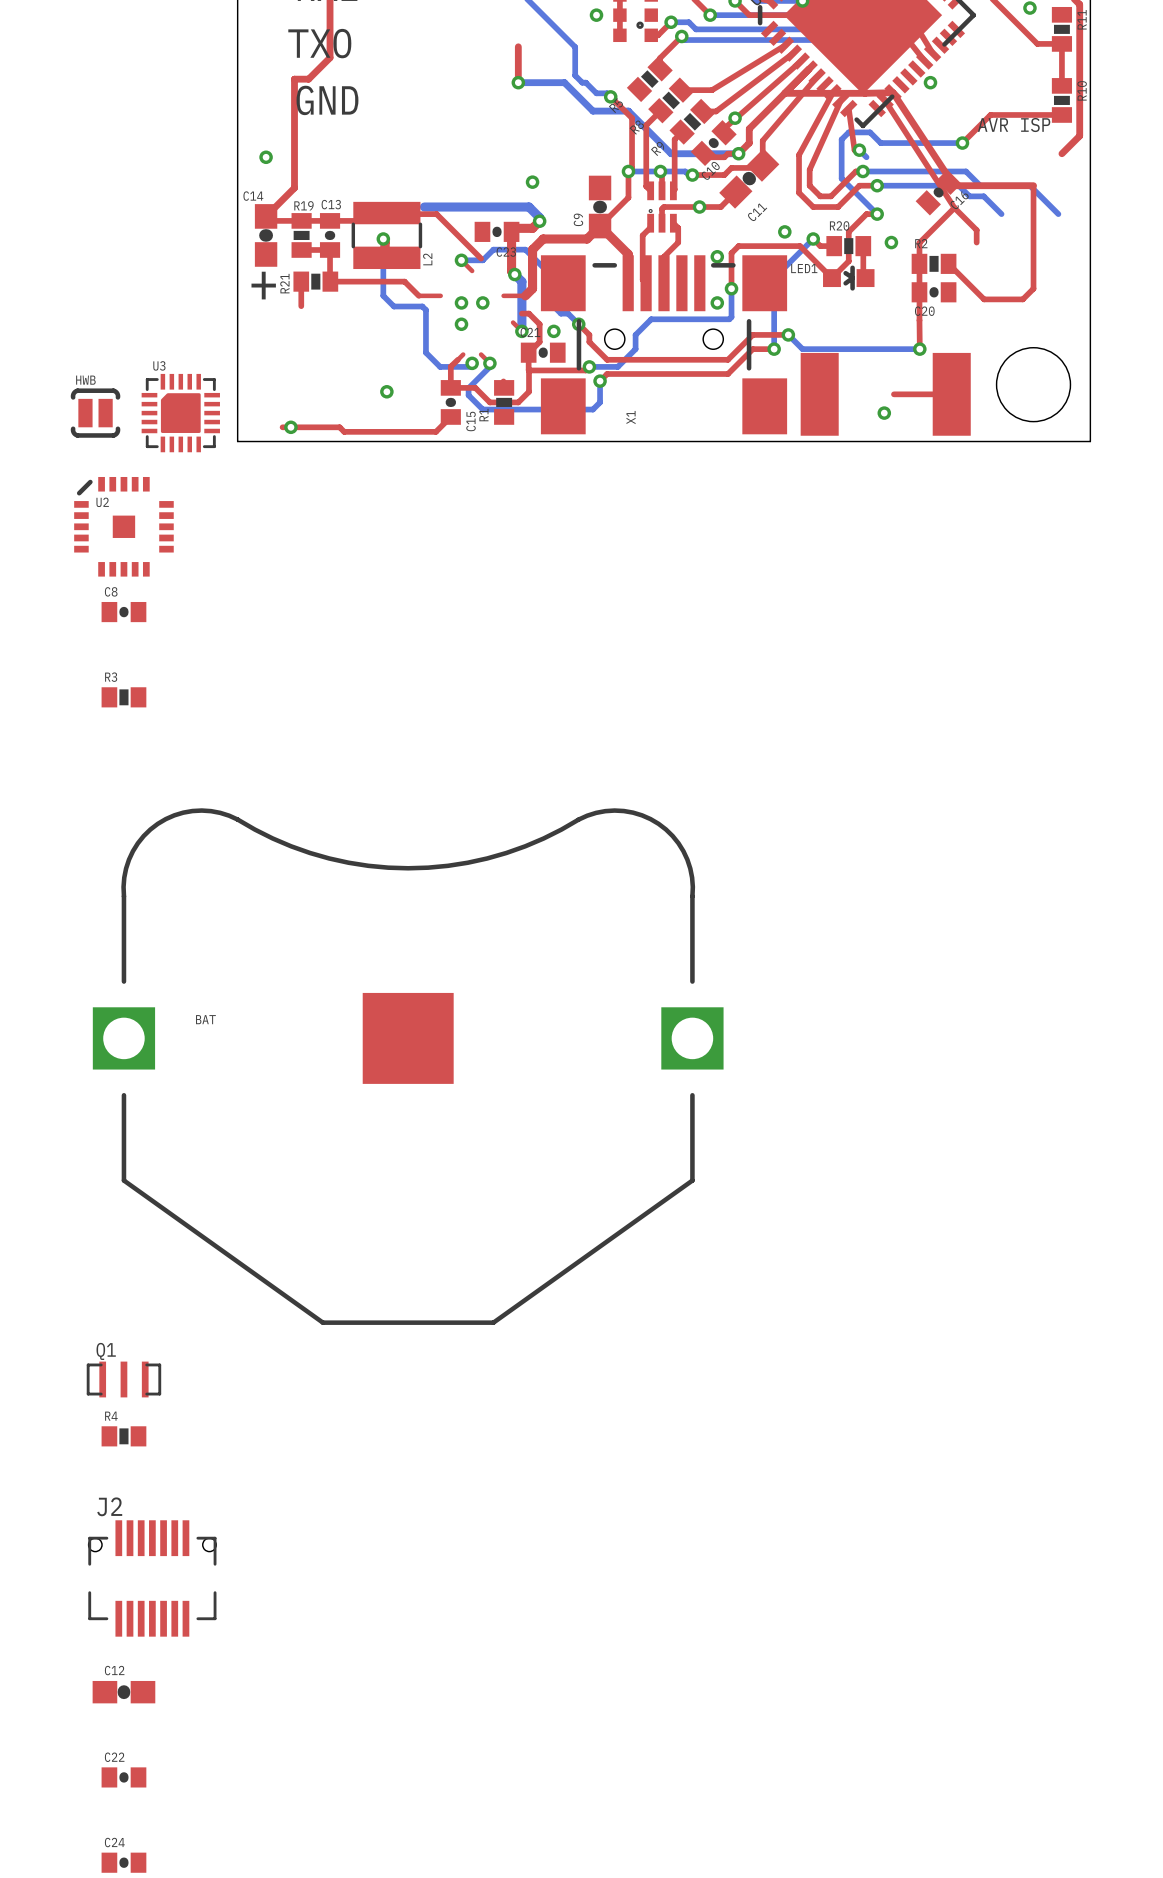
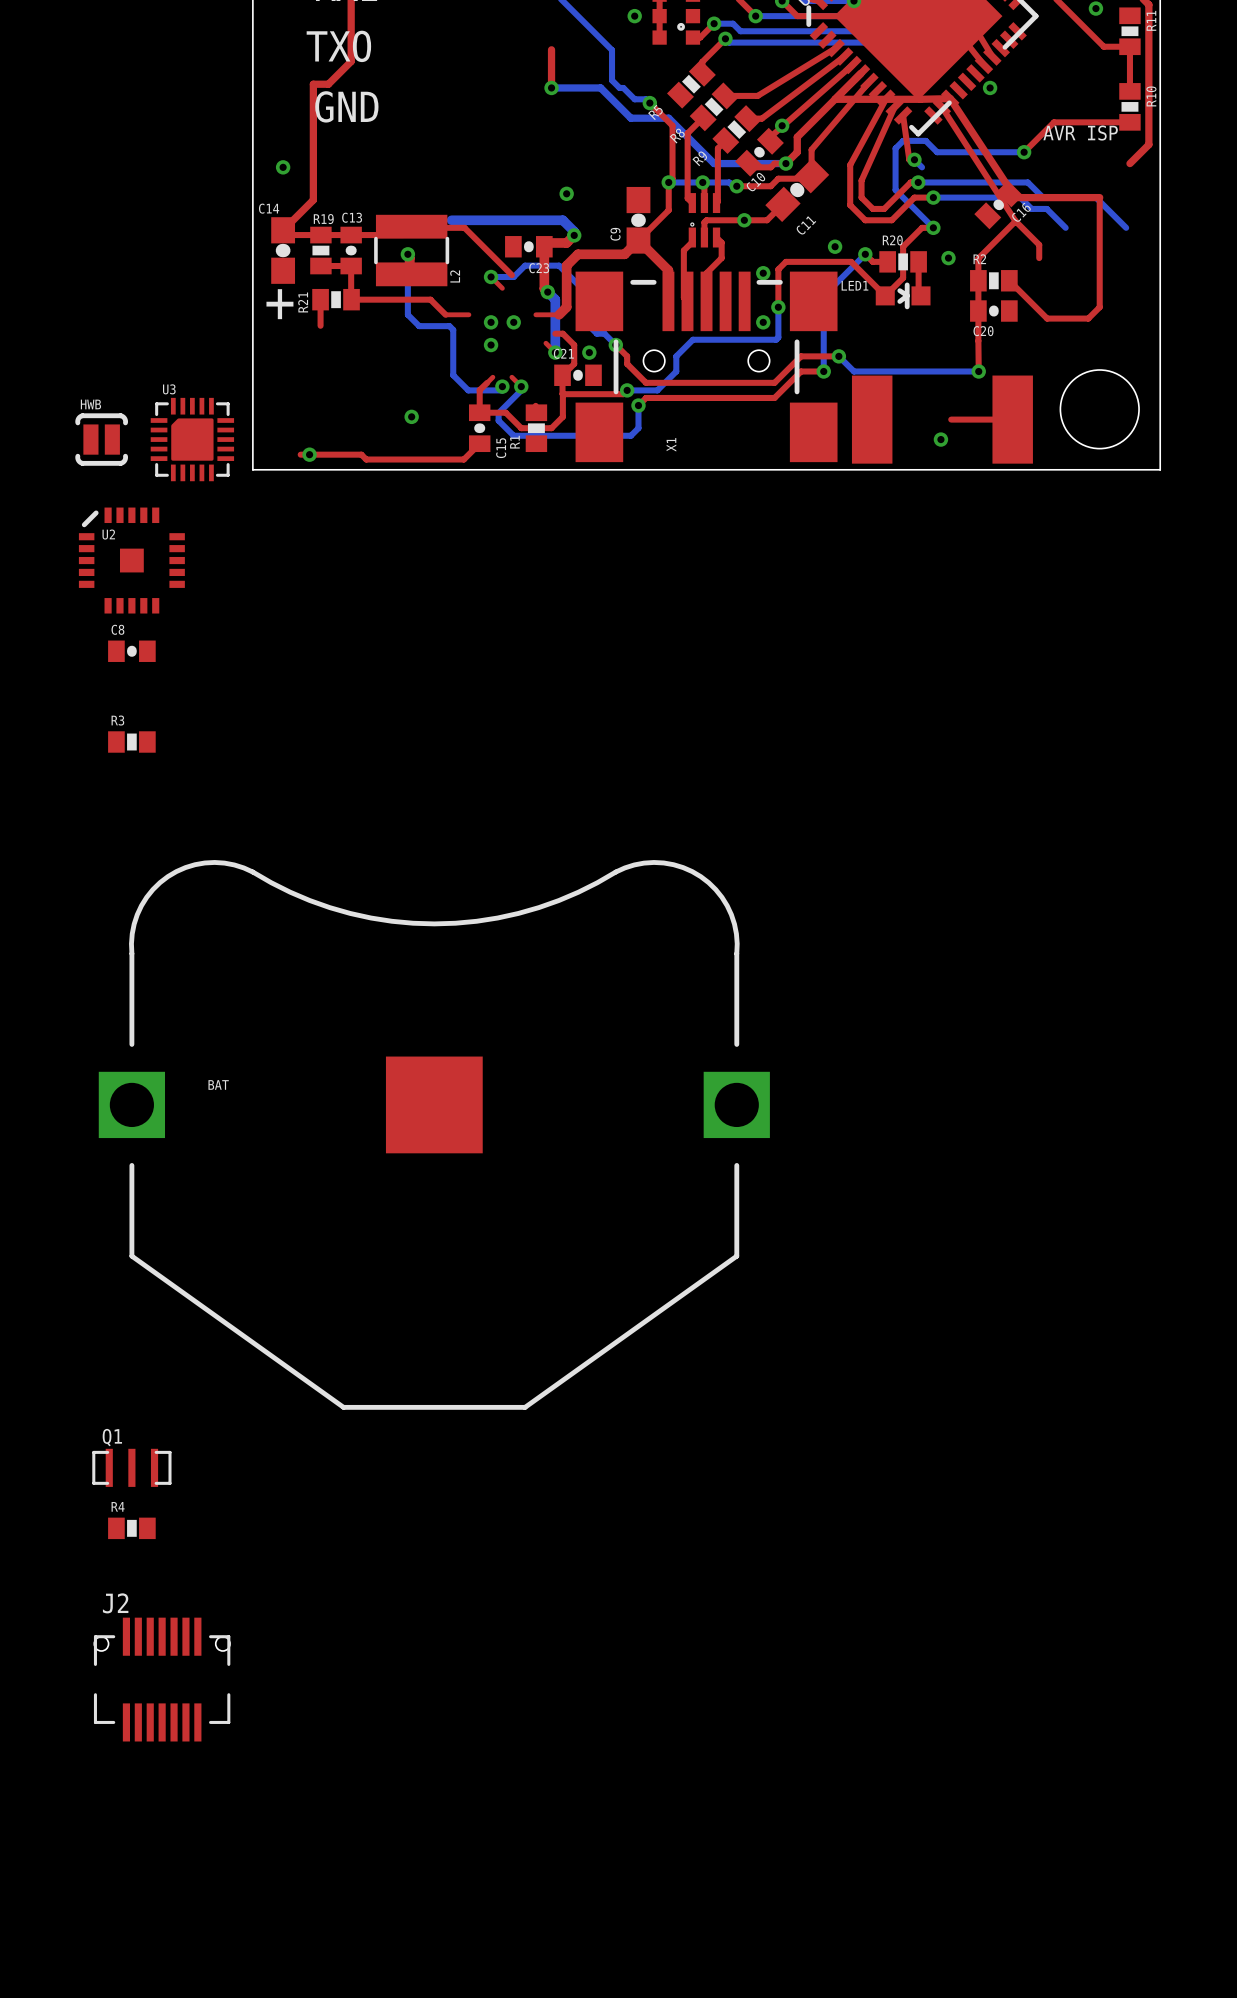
C12: (123, 1692) -> none
C22: (123, 1777) -> none
C24: (123, 1862) -> none

